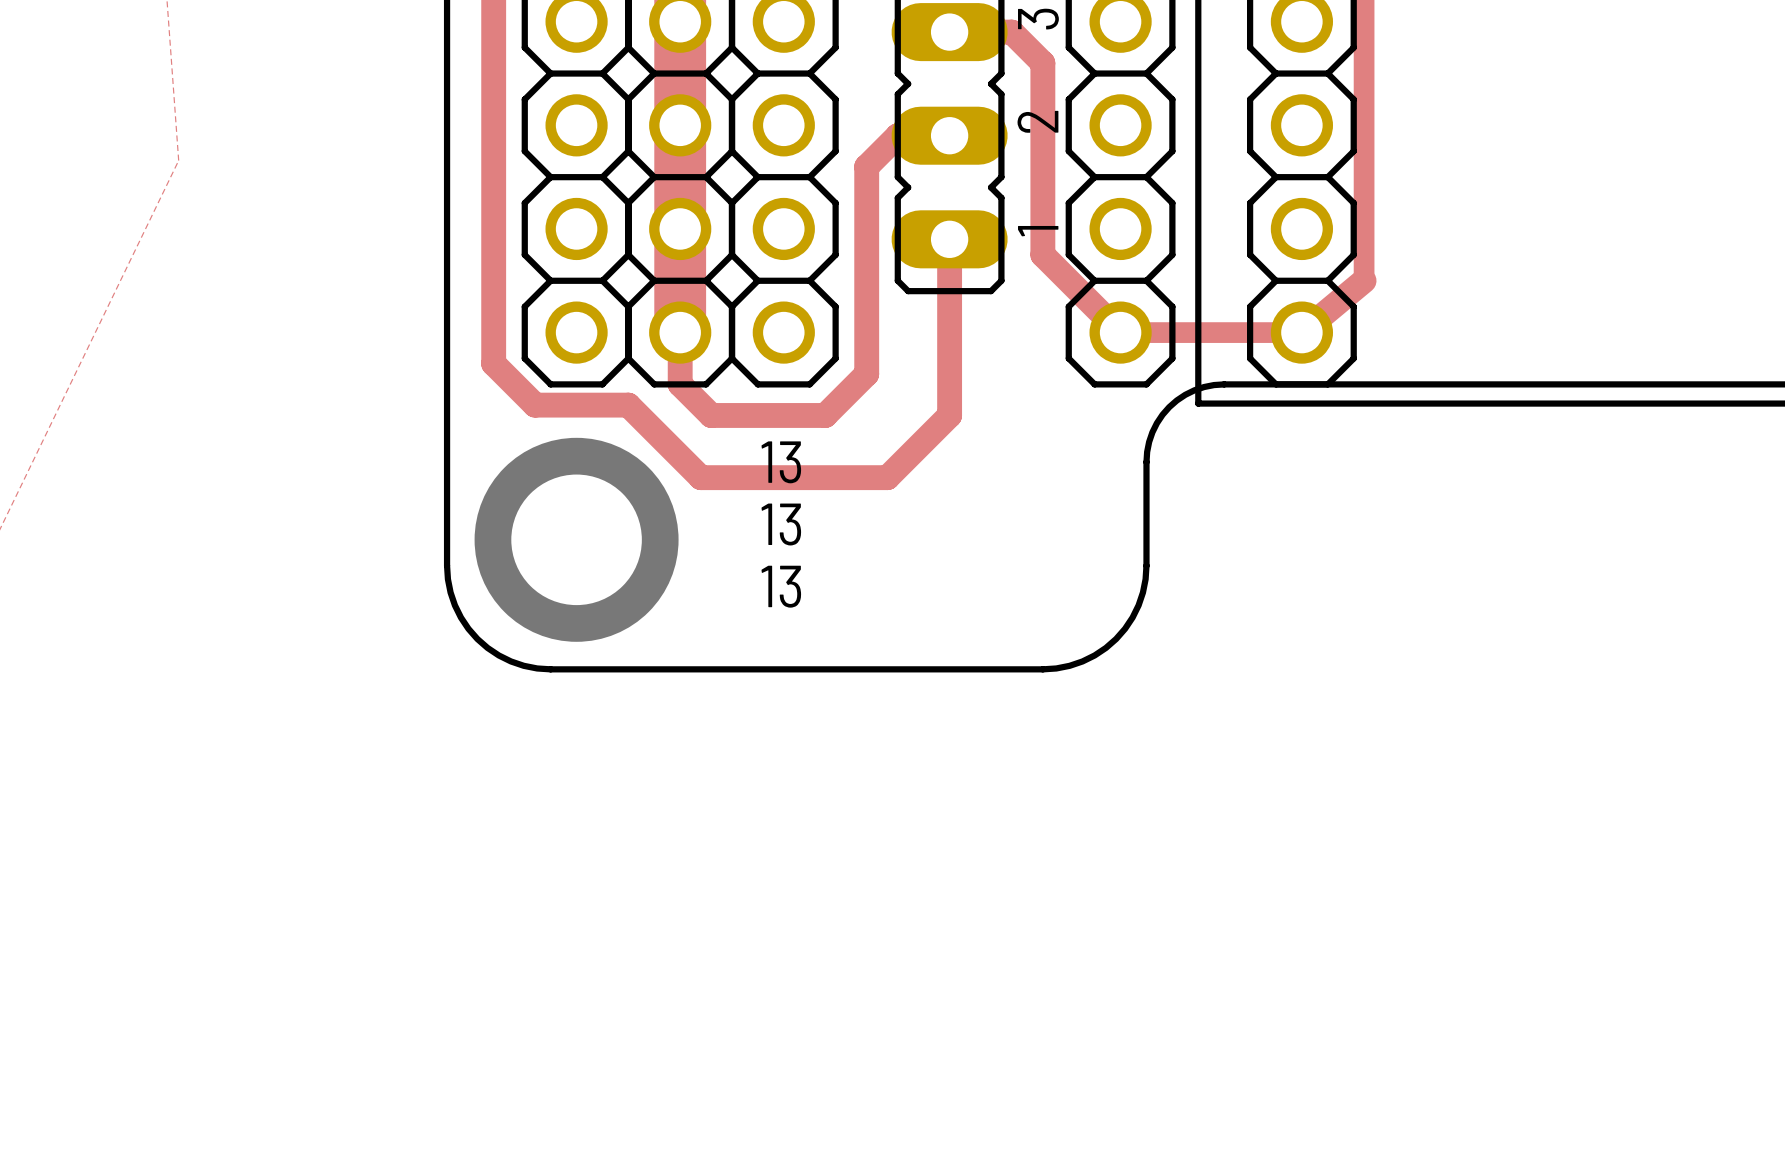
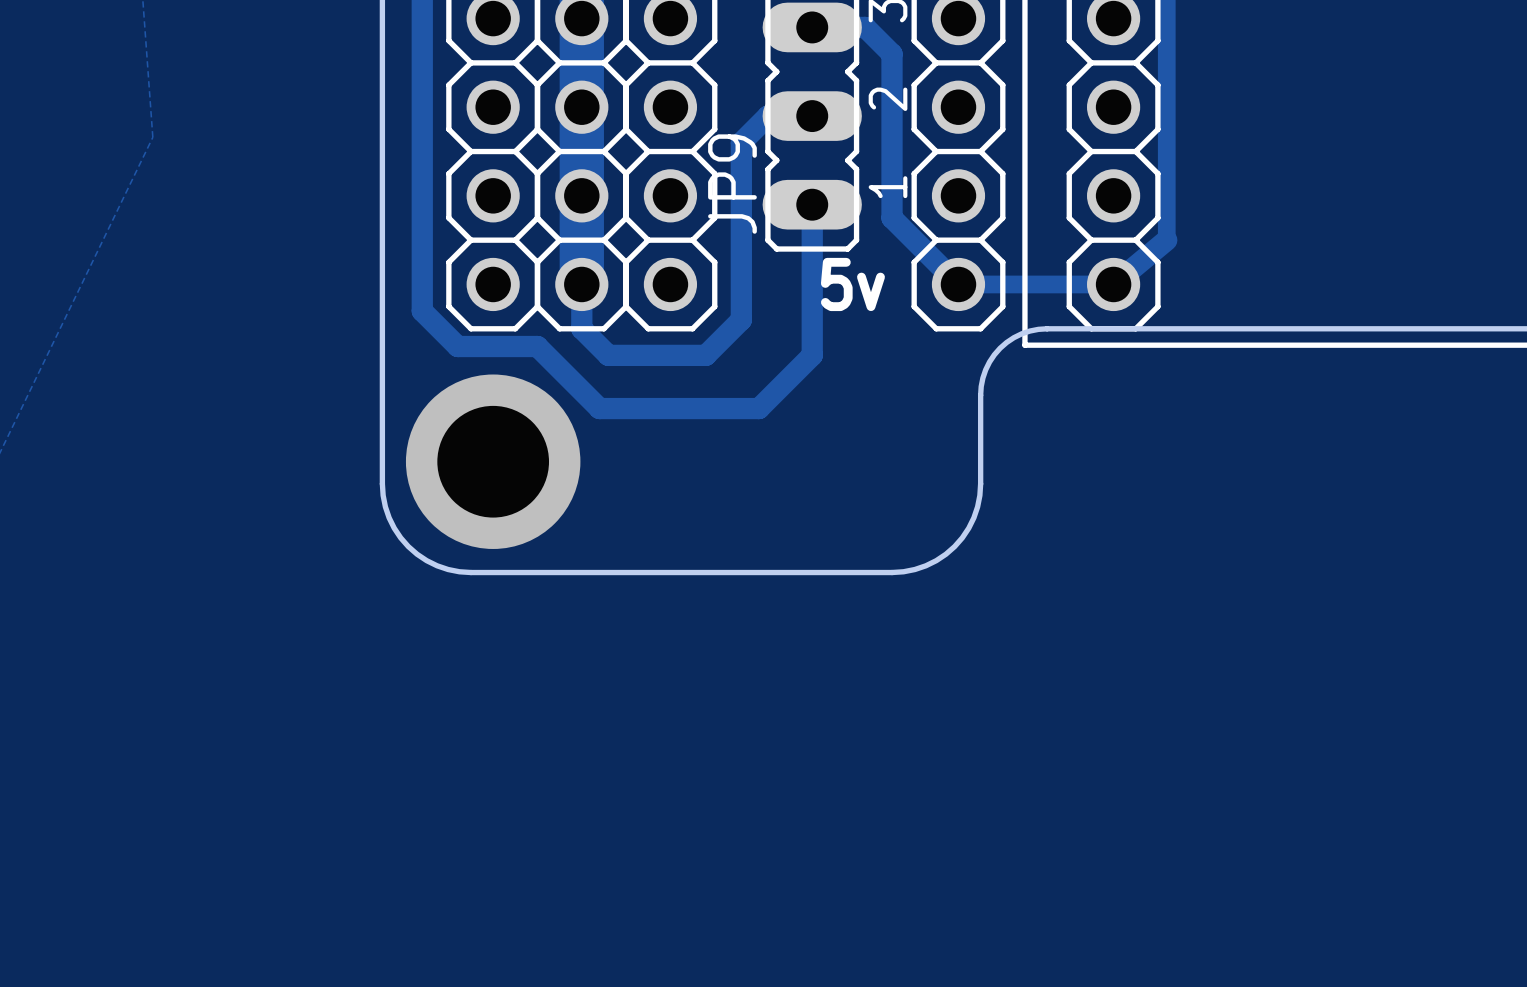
JP9 name: none -> JP9 (732, 184)
text: none -> 5v (852, 284)
text: 13 (781, 462) -> none
text: 13 (781, 524) -> none
text: 13 (781, 586) -> none

